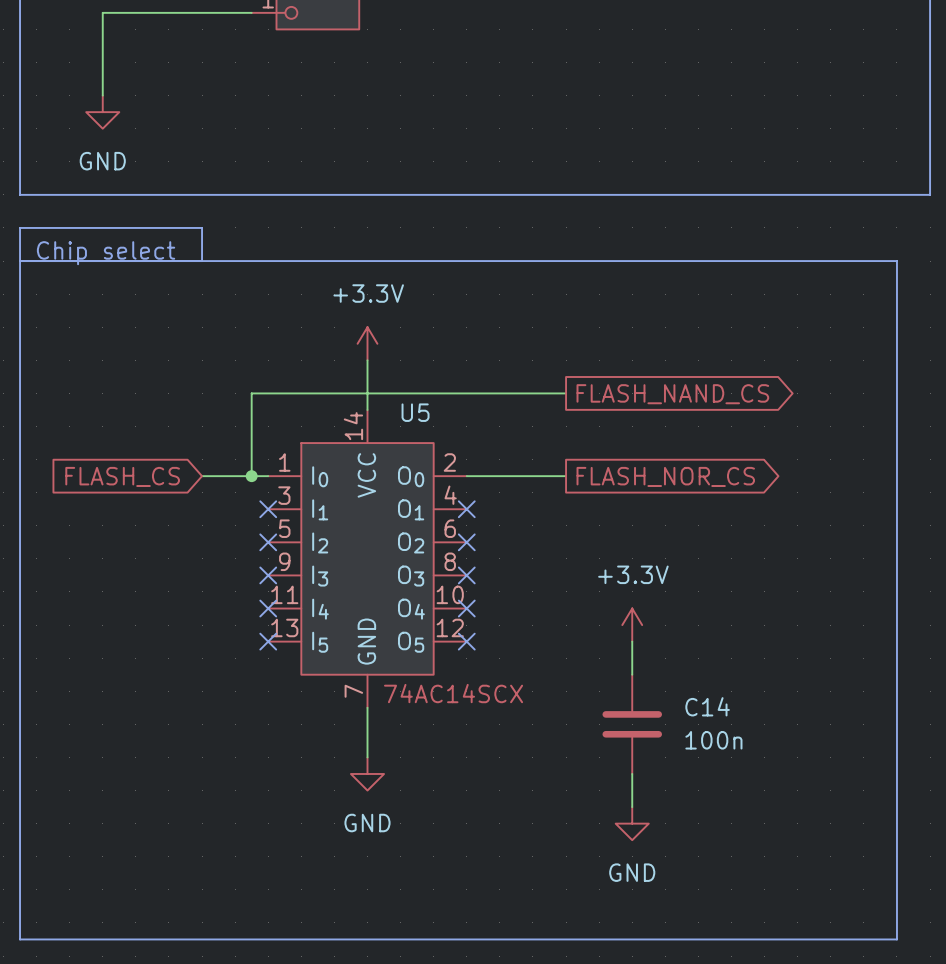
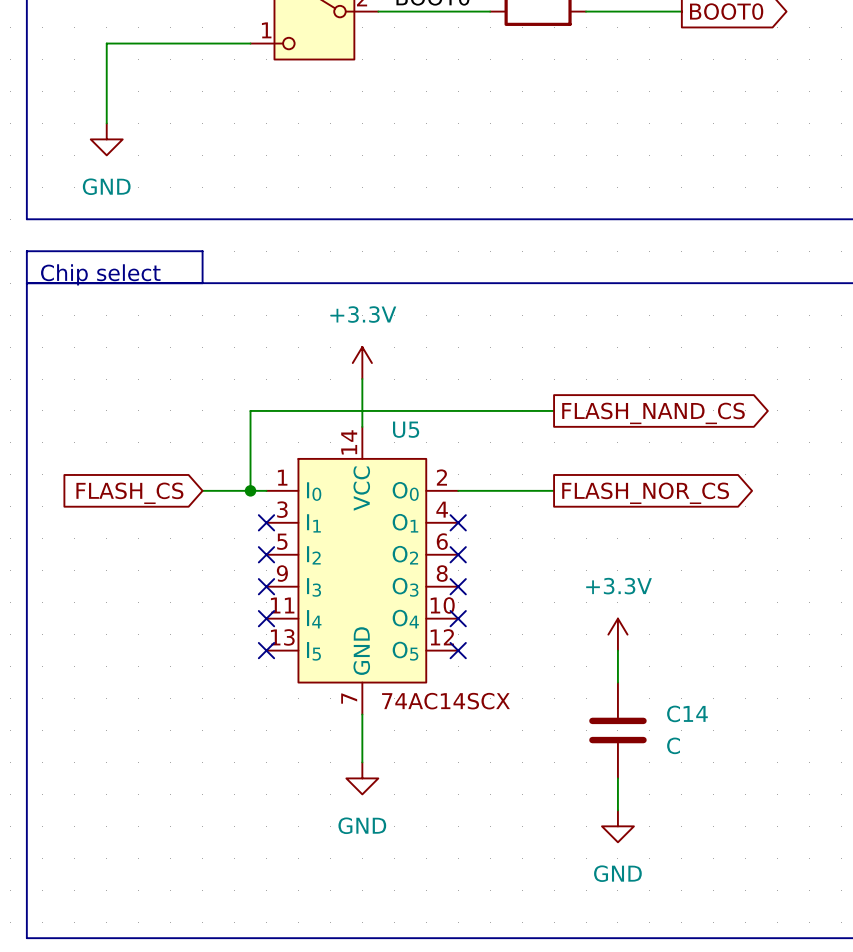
C14 value: 100n (713, 740) -> C (673, 745)

